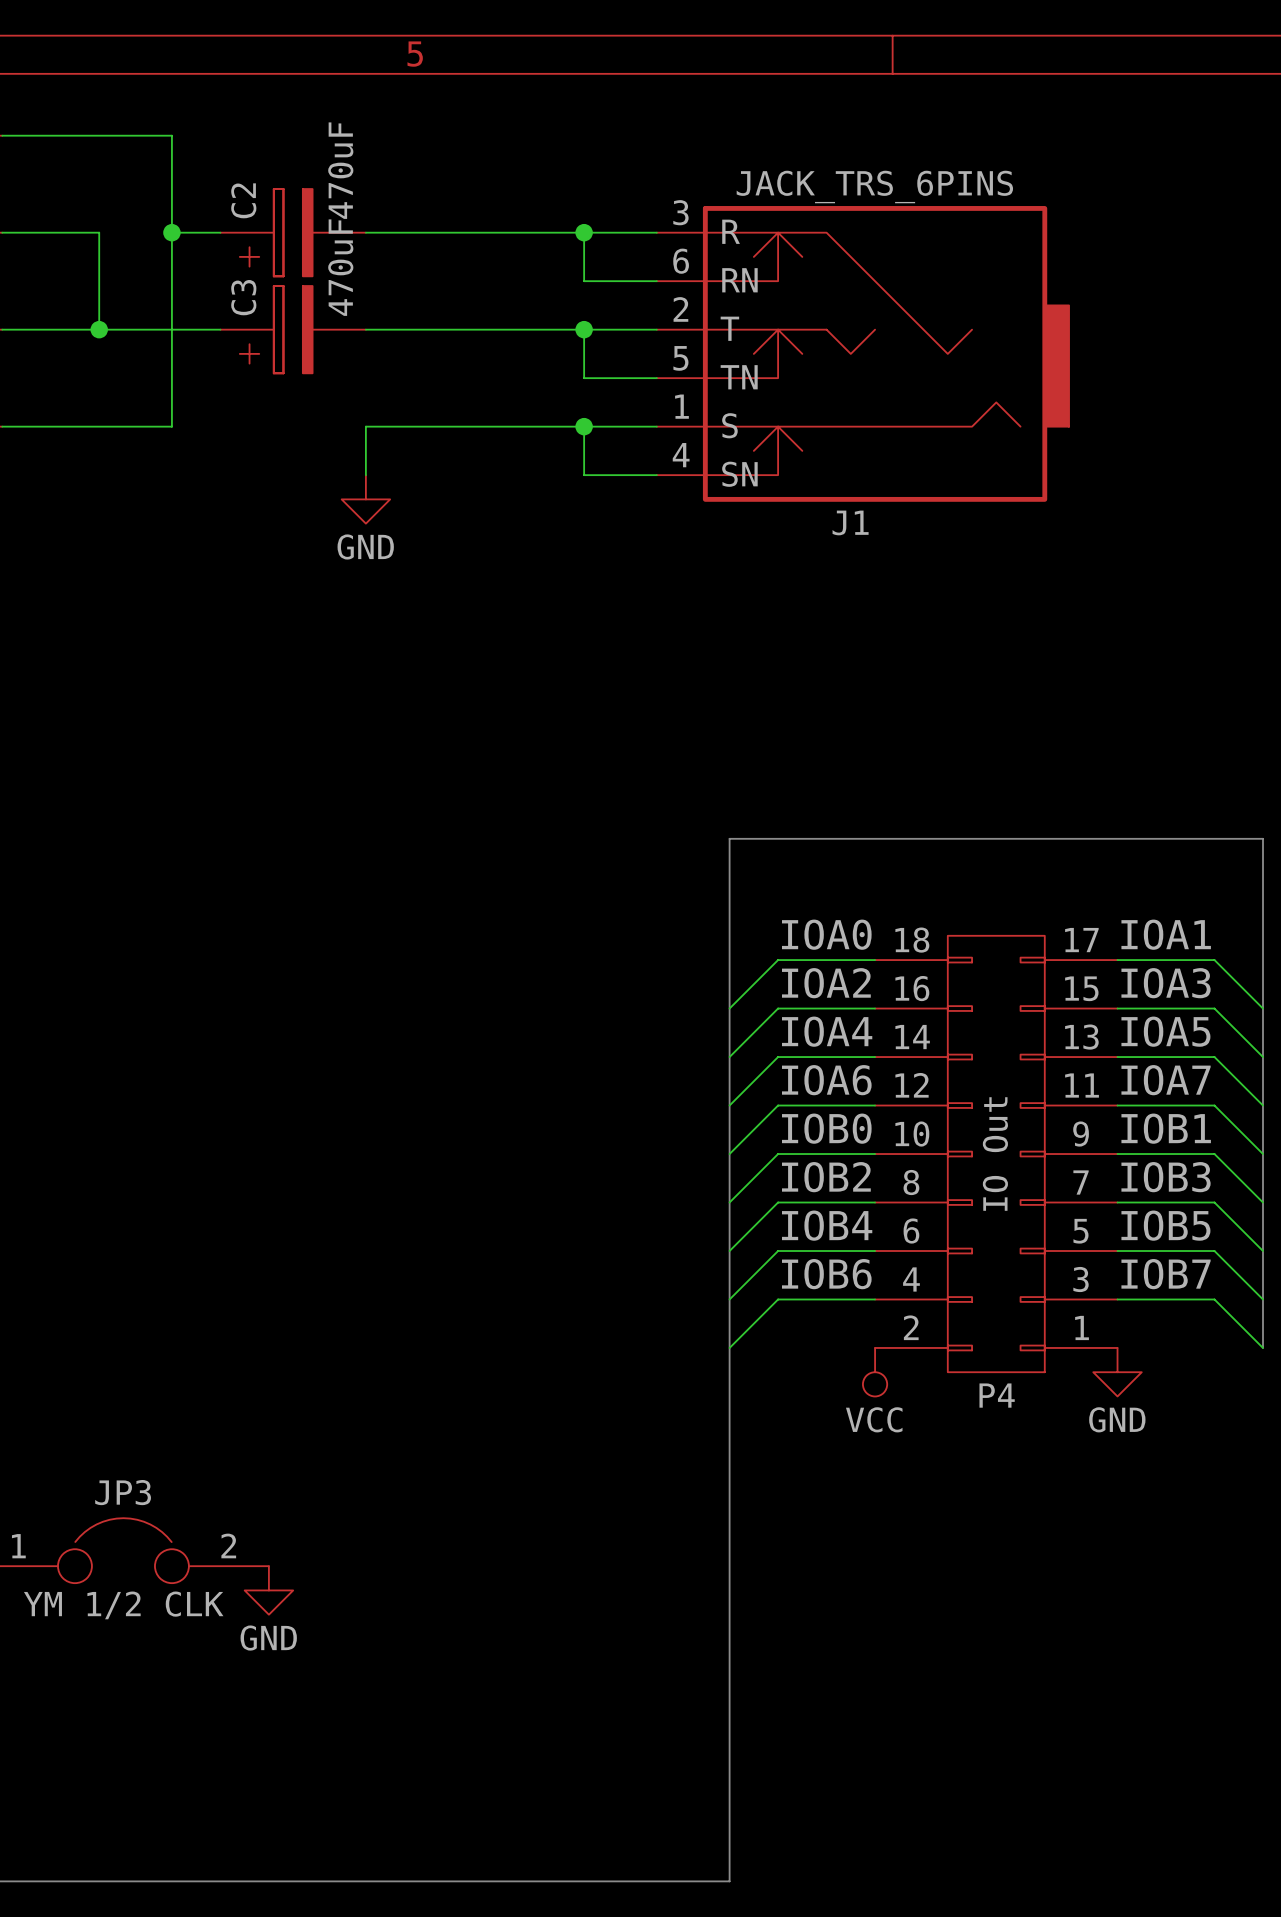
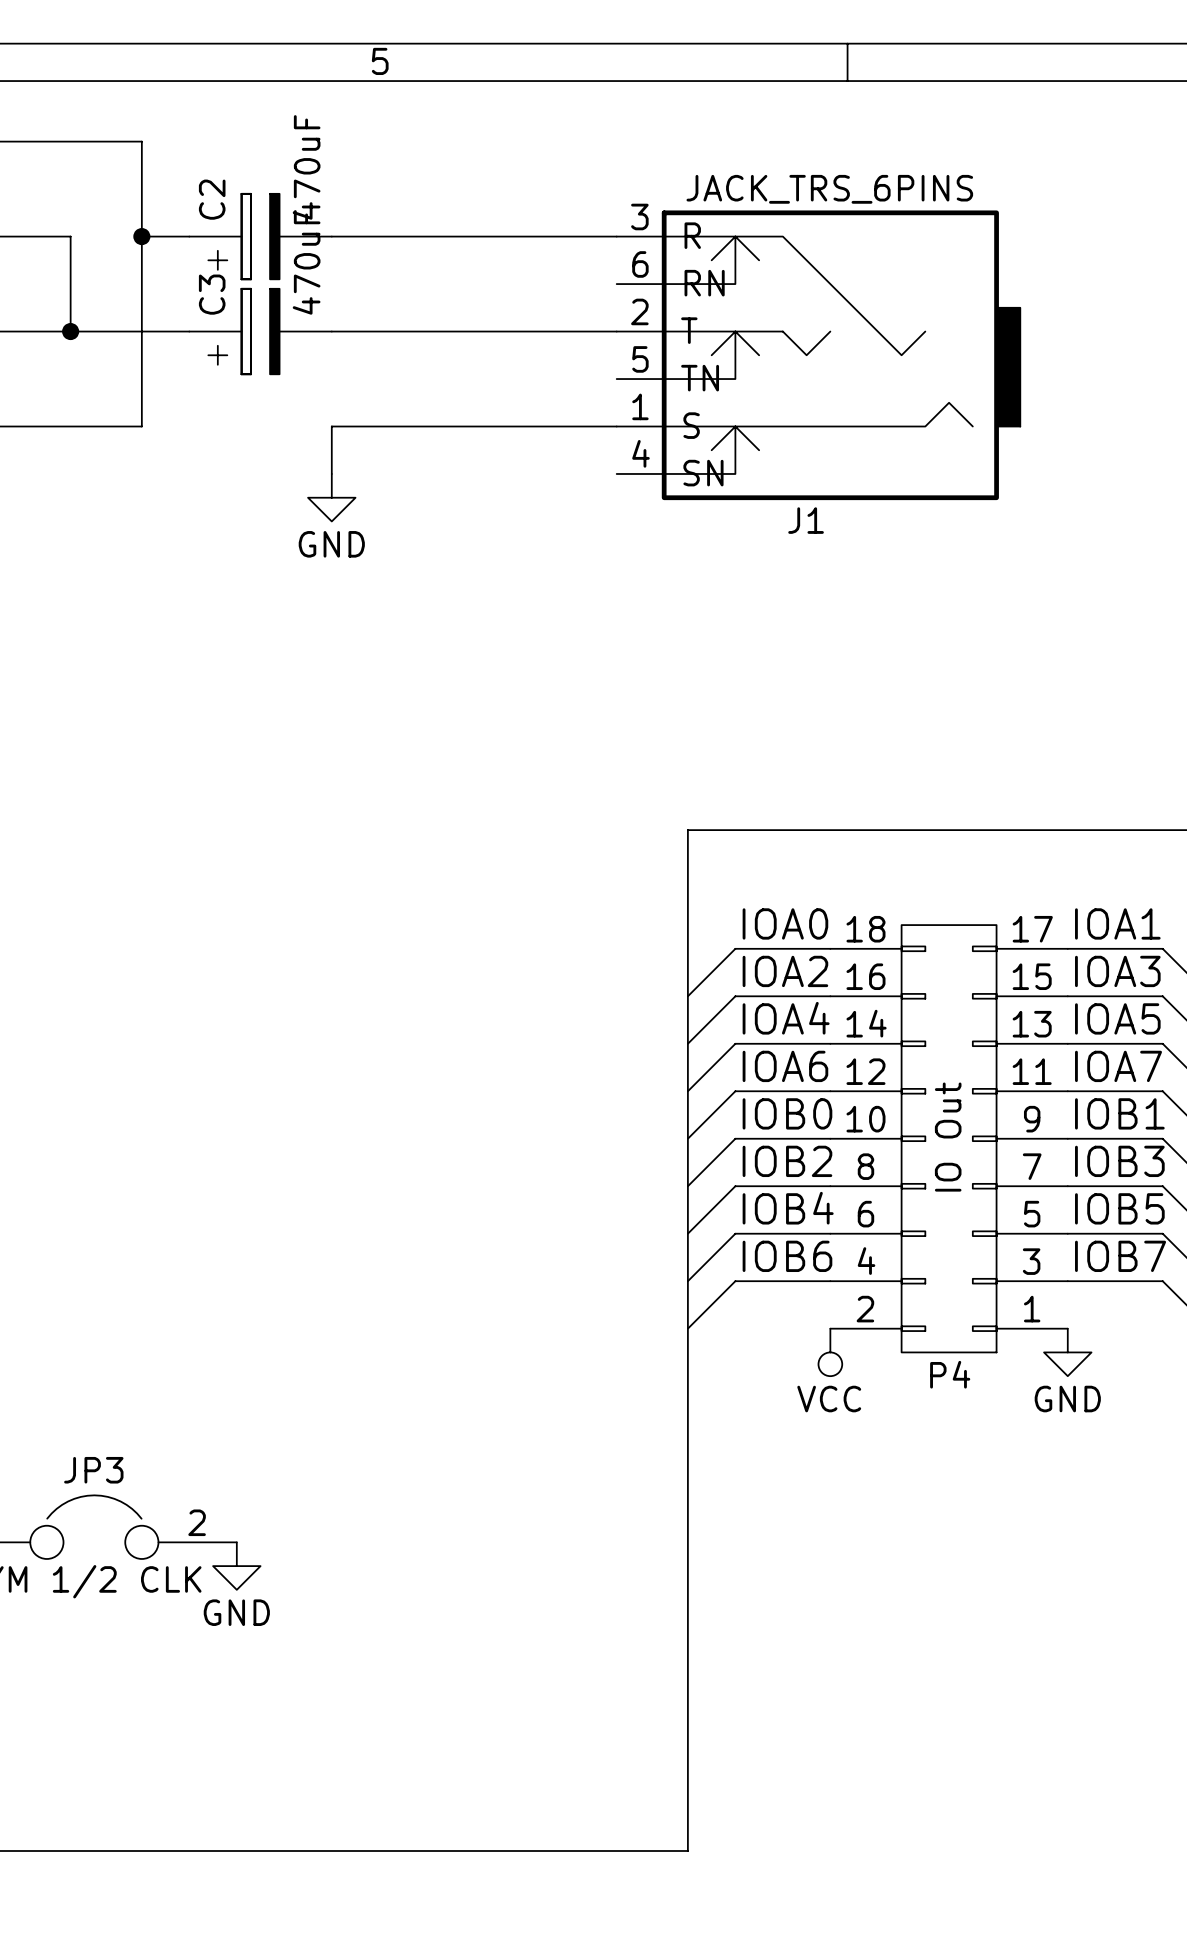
wire: (584, 232) (584, 281) (656, 281) -> none
junction: (584, 232) -> none
wire: (584, 329) (584, 378) (656, 378) -> none
junction: (584, 329) -> none
wire: (584, 426) (584, 475) (656, 475) -> none
junction: (584, 426) -> none

